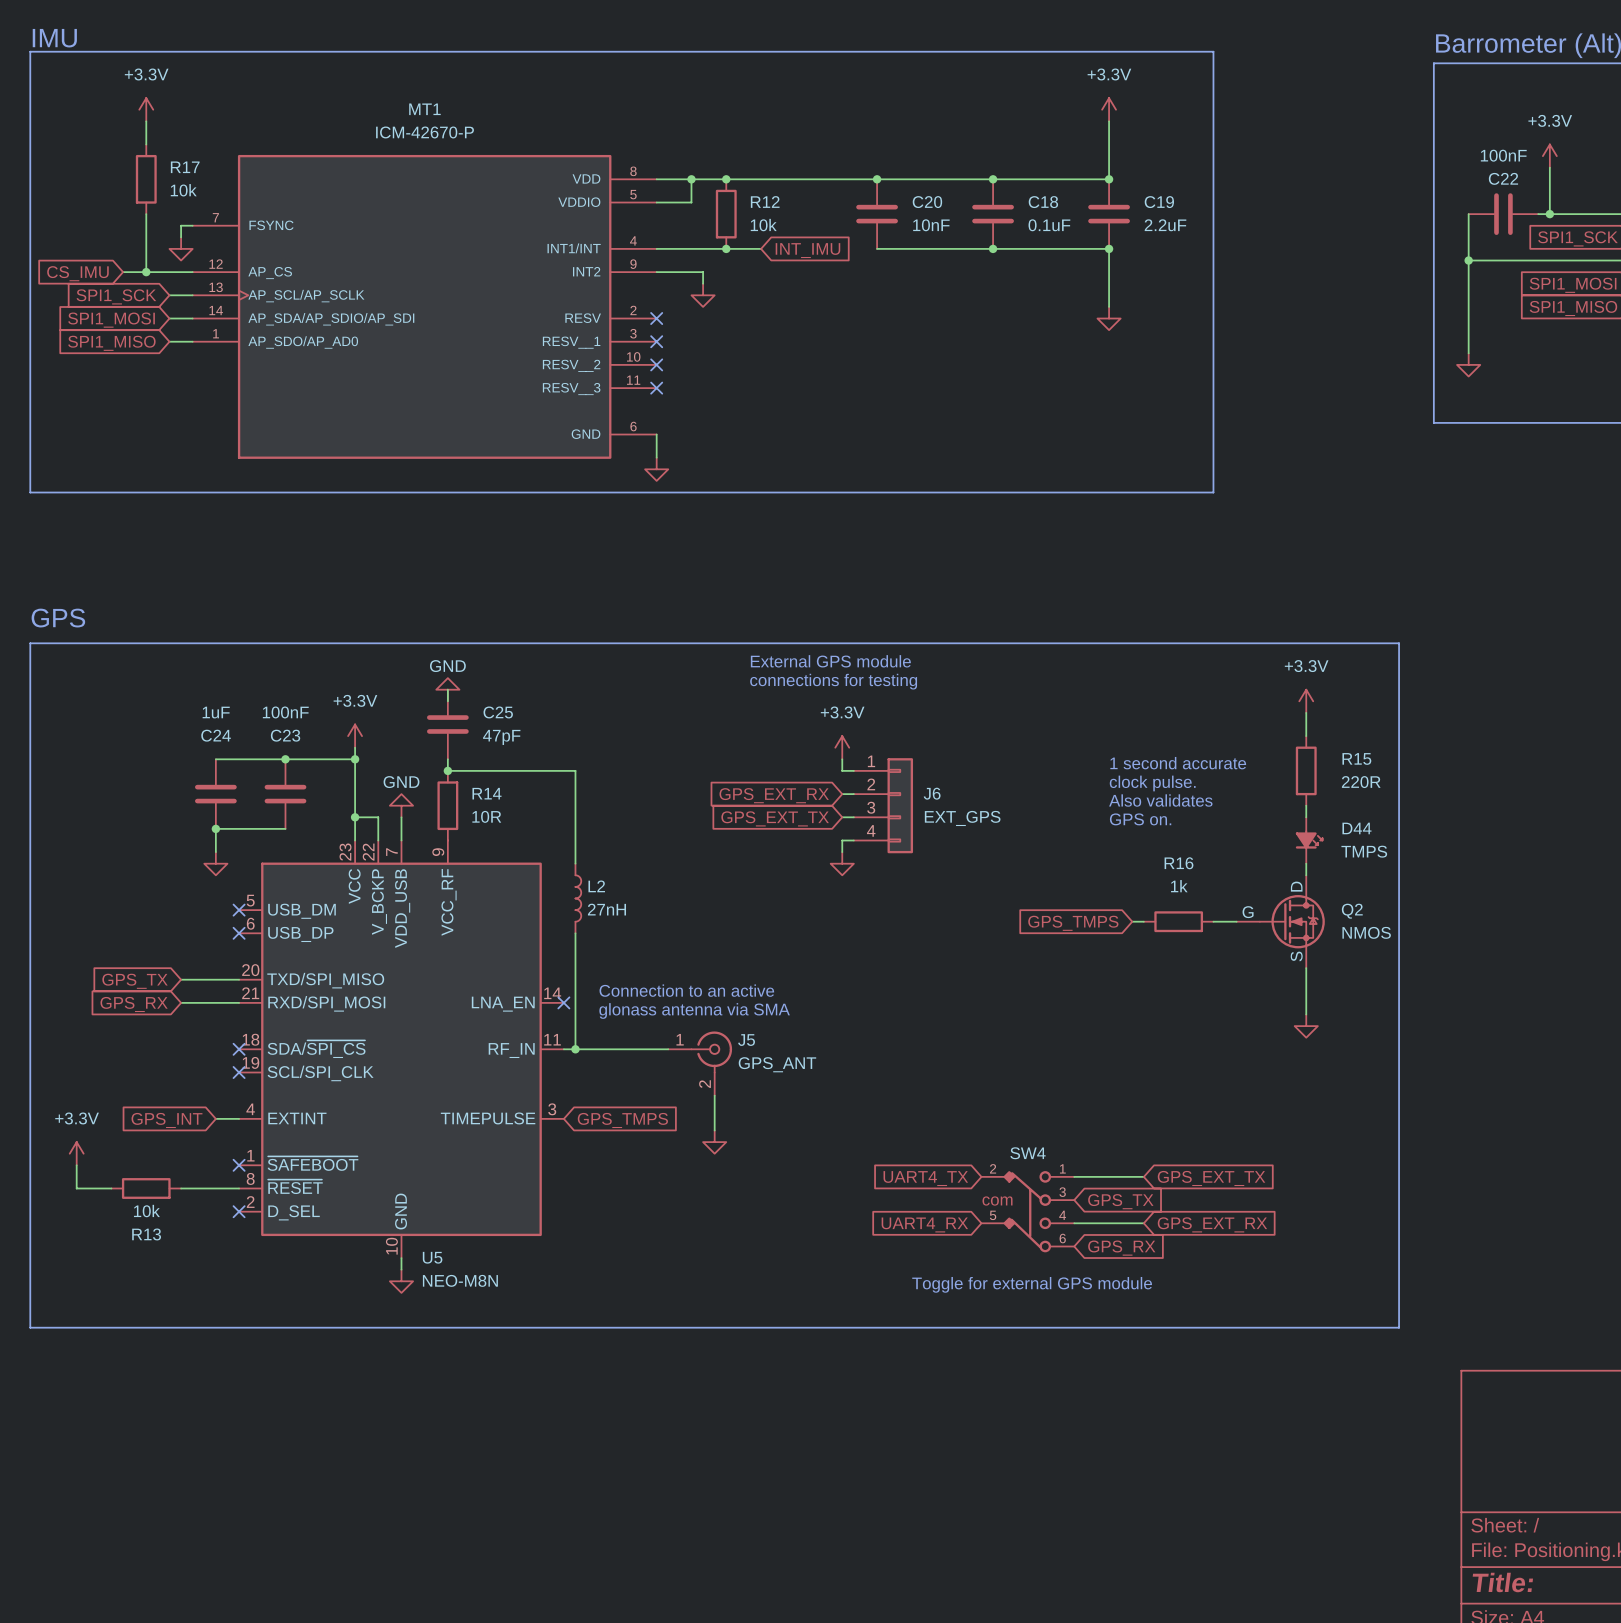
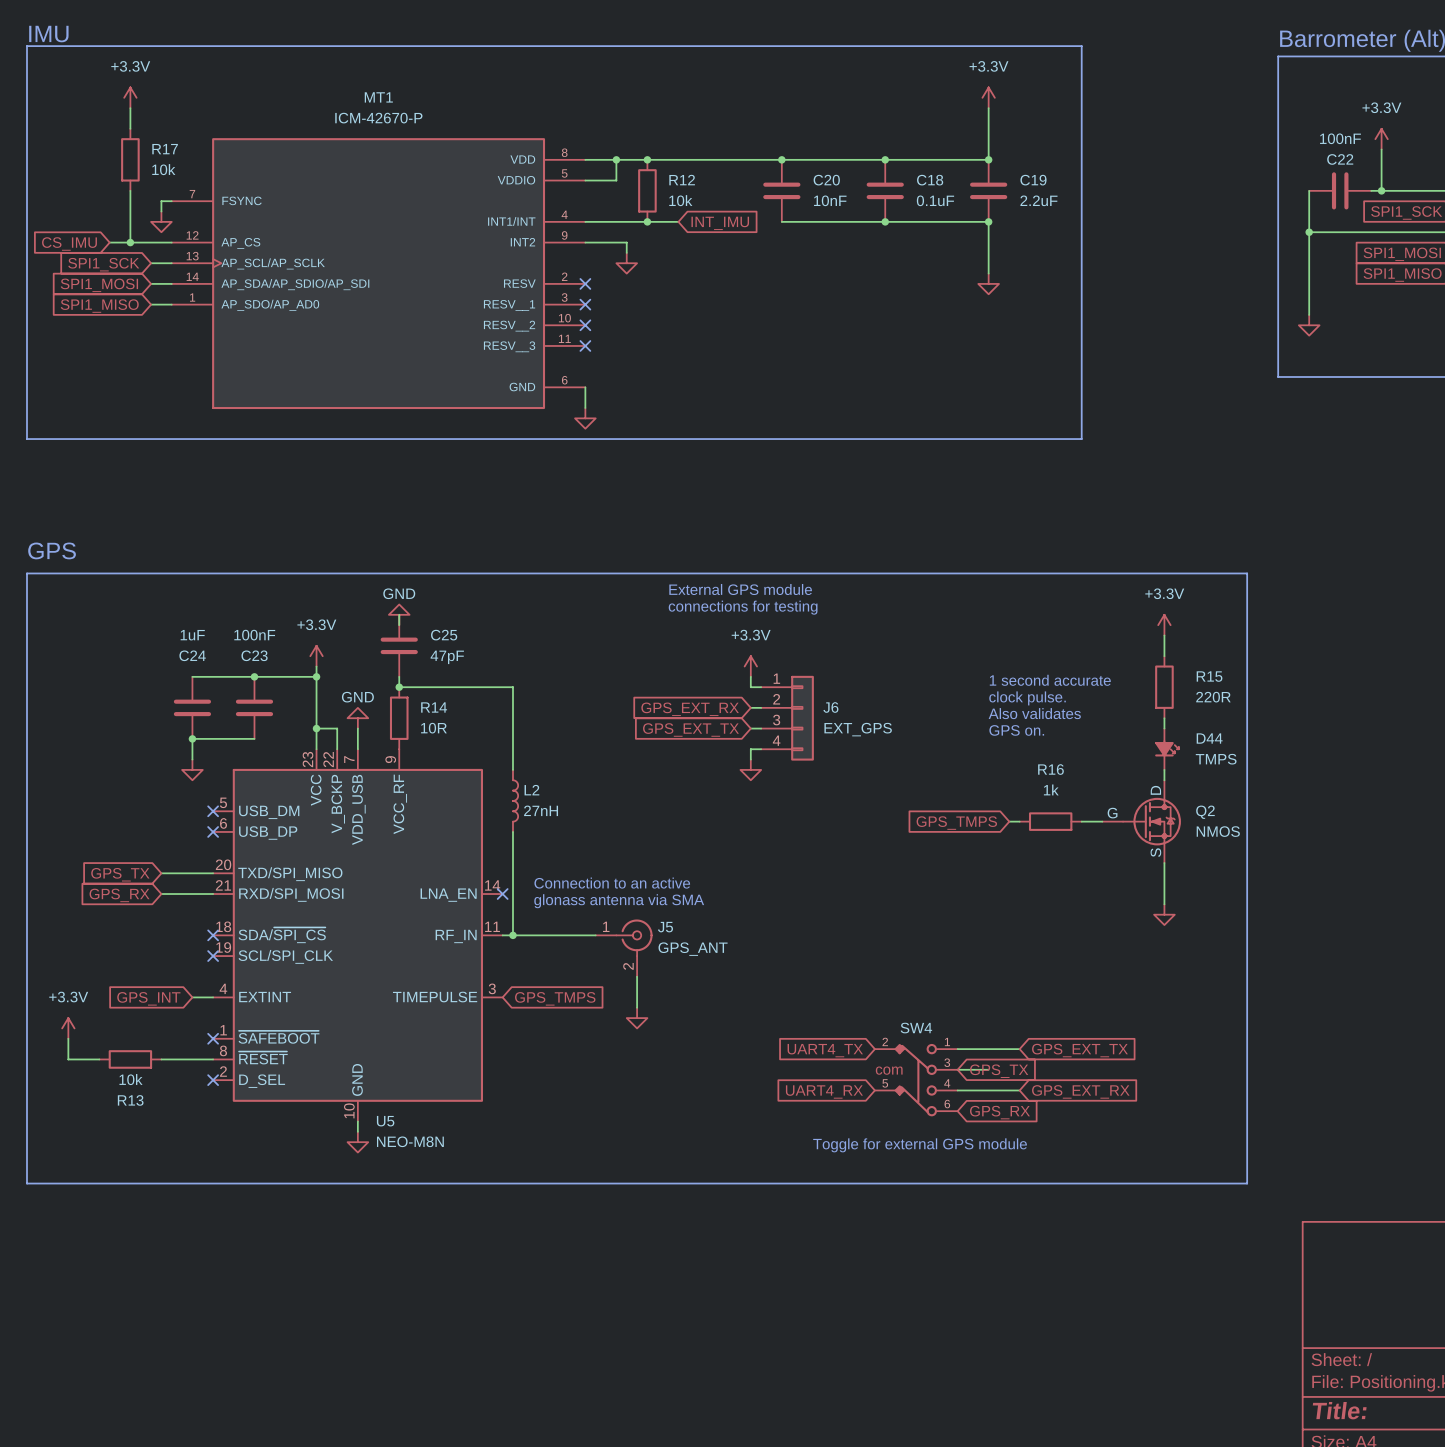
wire: none -> (957, 1069) (988, 1069)

